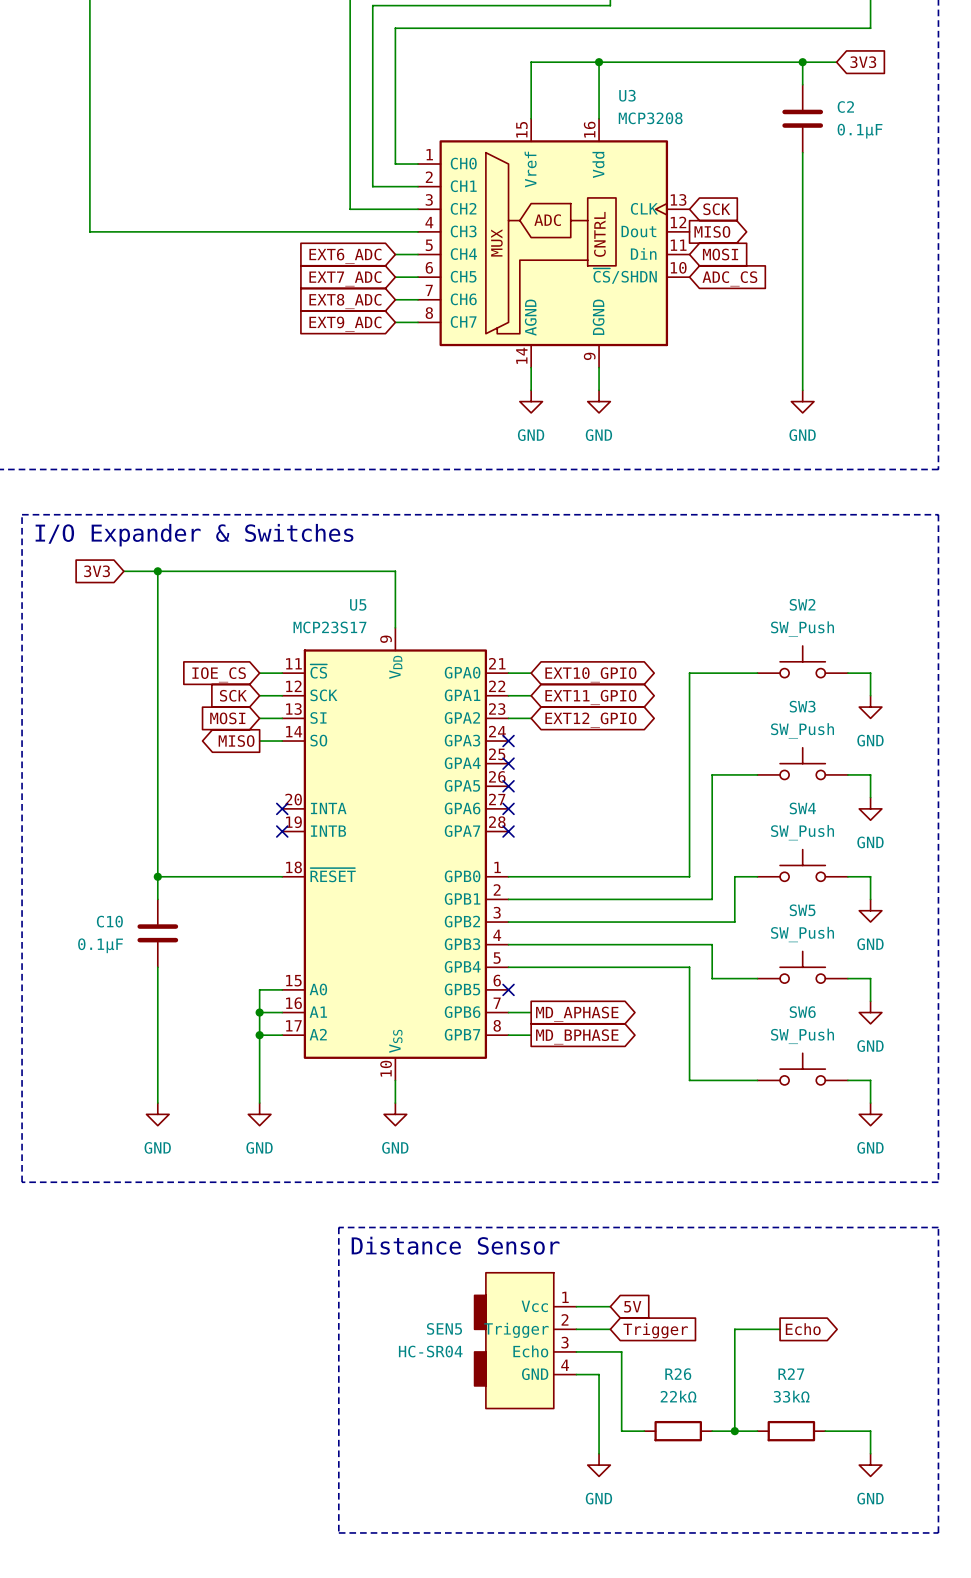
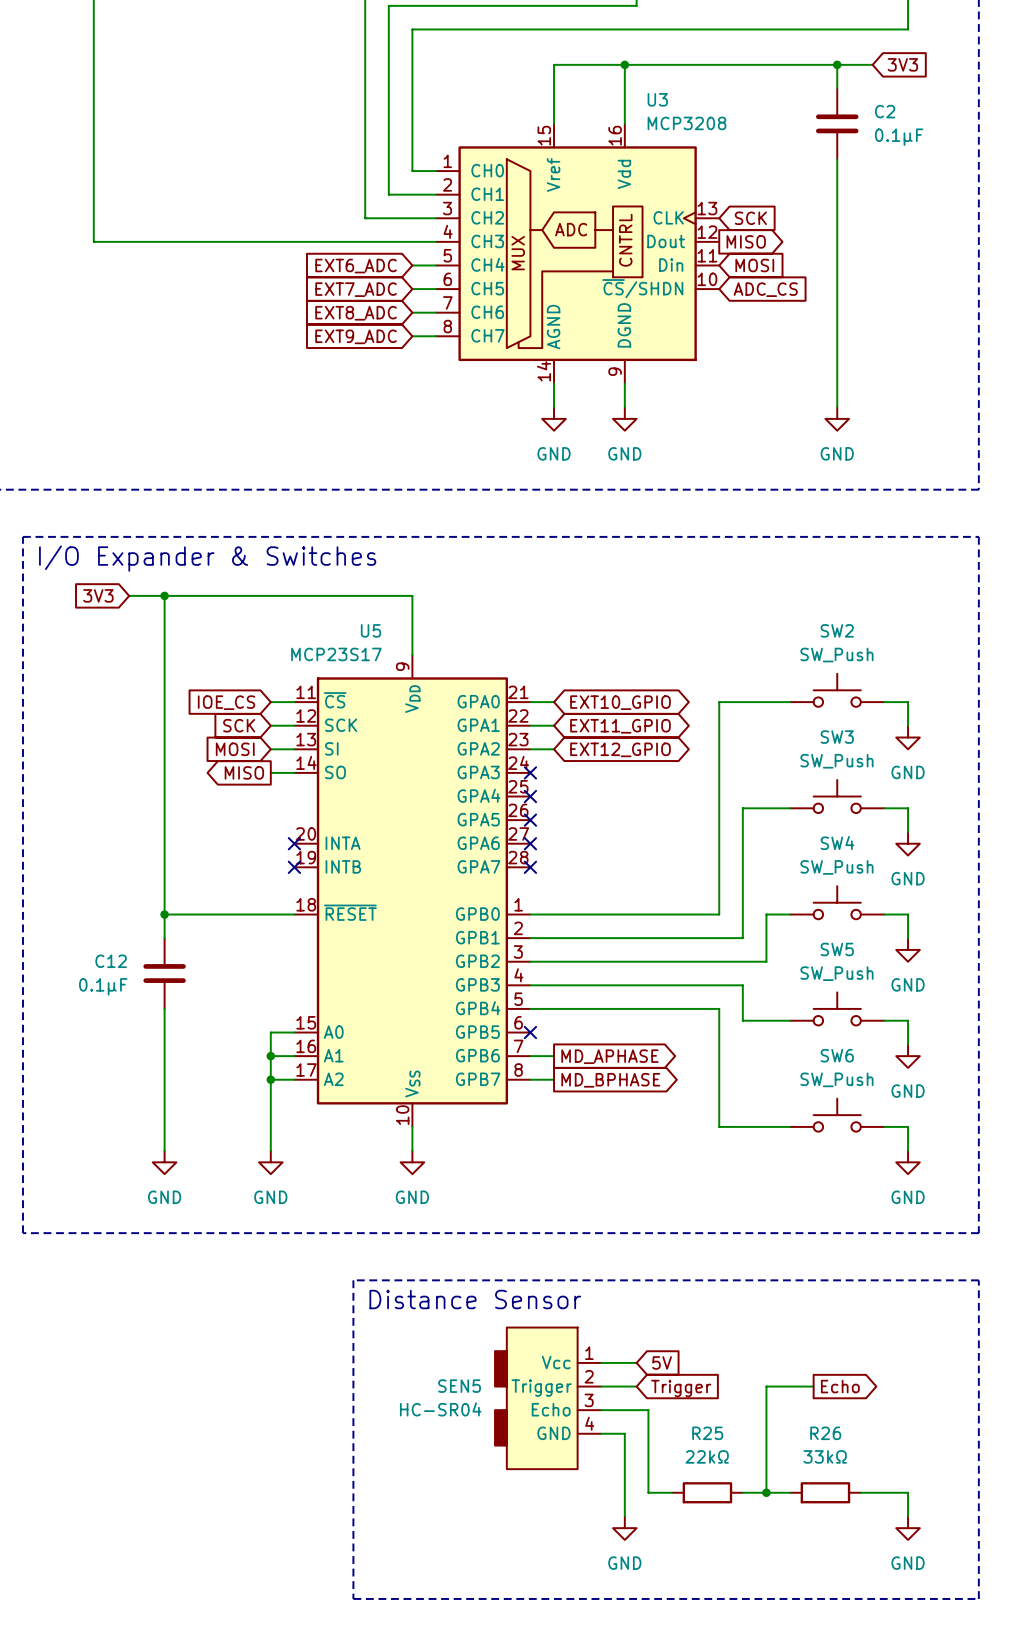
C10 name: C10 (109, 921) -> C12 (111, 961)
R26 name: R26 (678, 1374) -> R25 (707, 1433)
R27 name: R27 (791, 1374) -> R26 (825, 1433)

